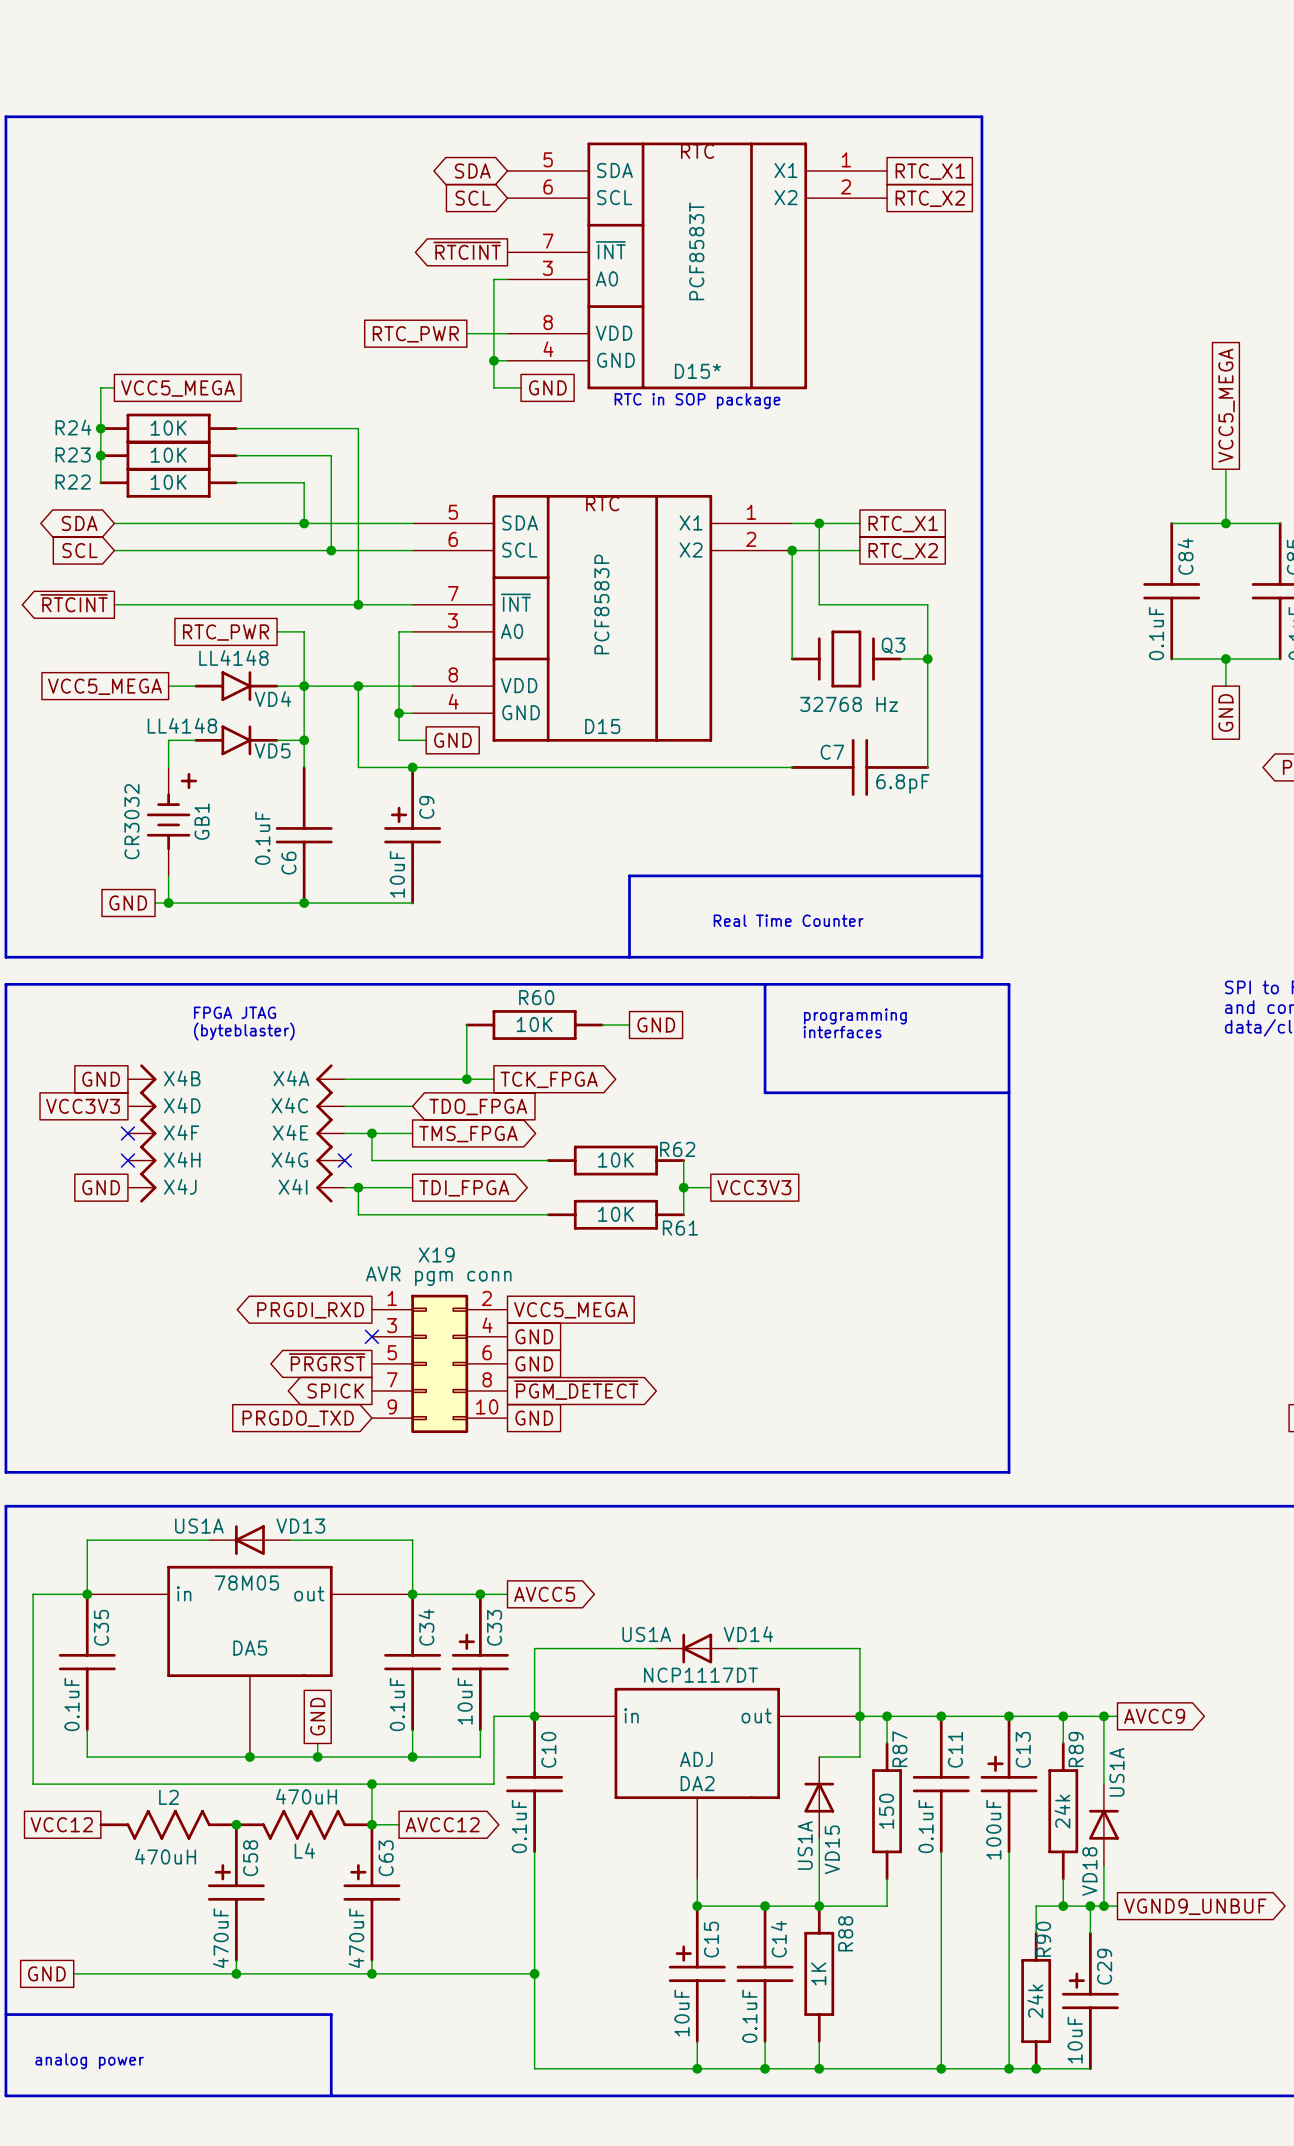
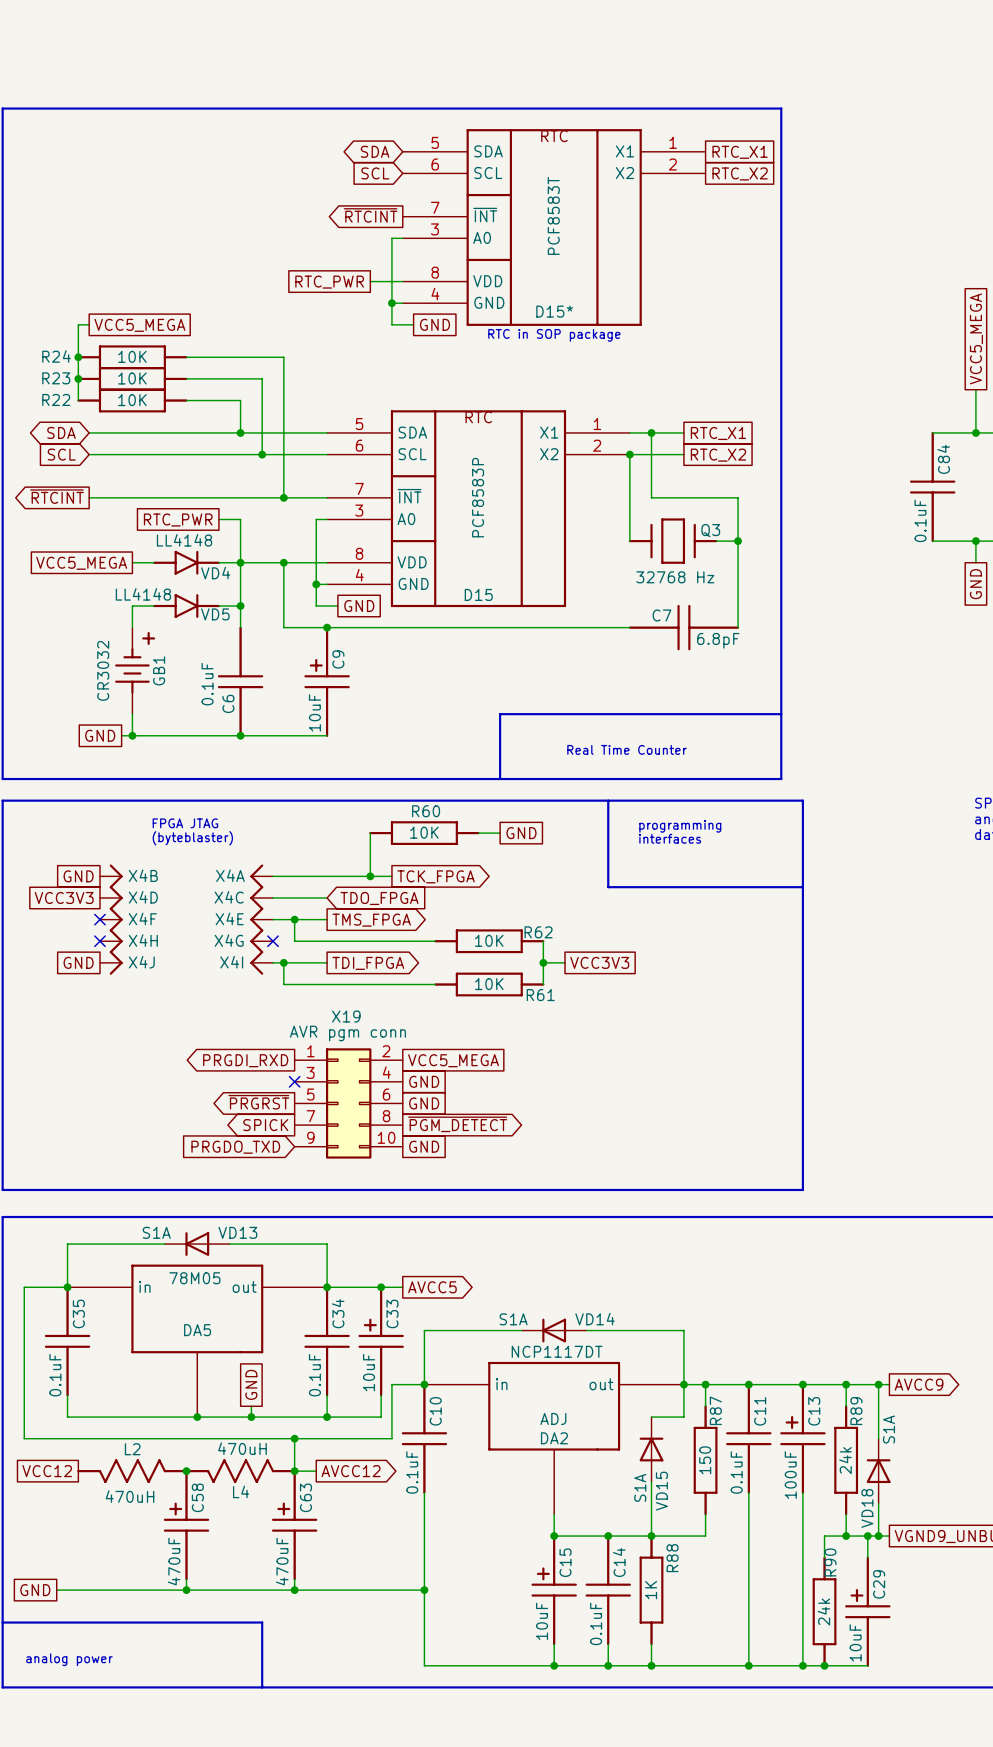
VD13 value: US1A (199, 1526) -> S1A (156, 1232)
VD14 value: US1A (646, 1634) -> S1A (513, 1319)
VD18 value: US1A (1116, 1772) -> S1A (889, 1429)
VD15 value: US1A (805, 1845) -> S1A (640, 1487)

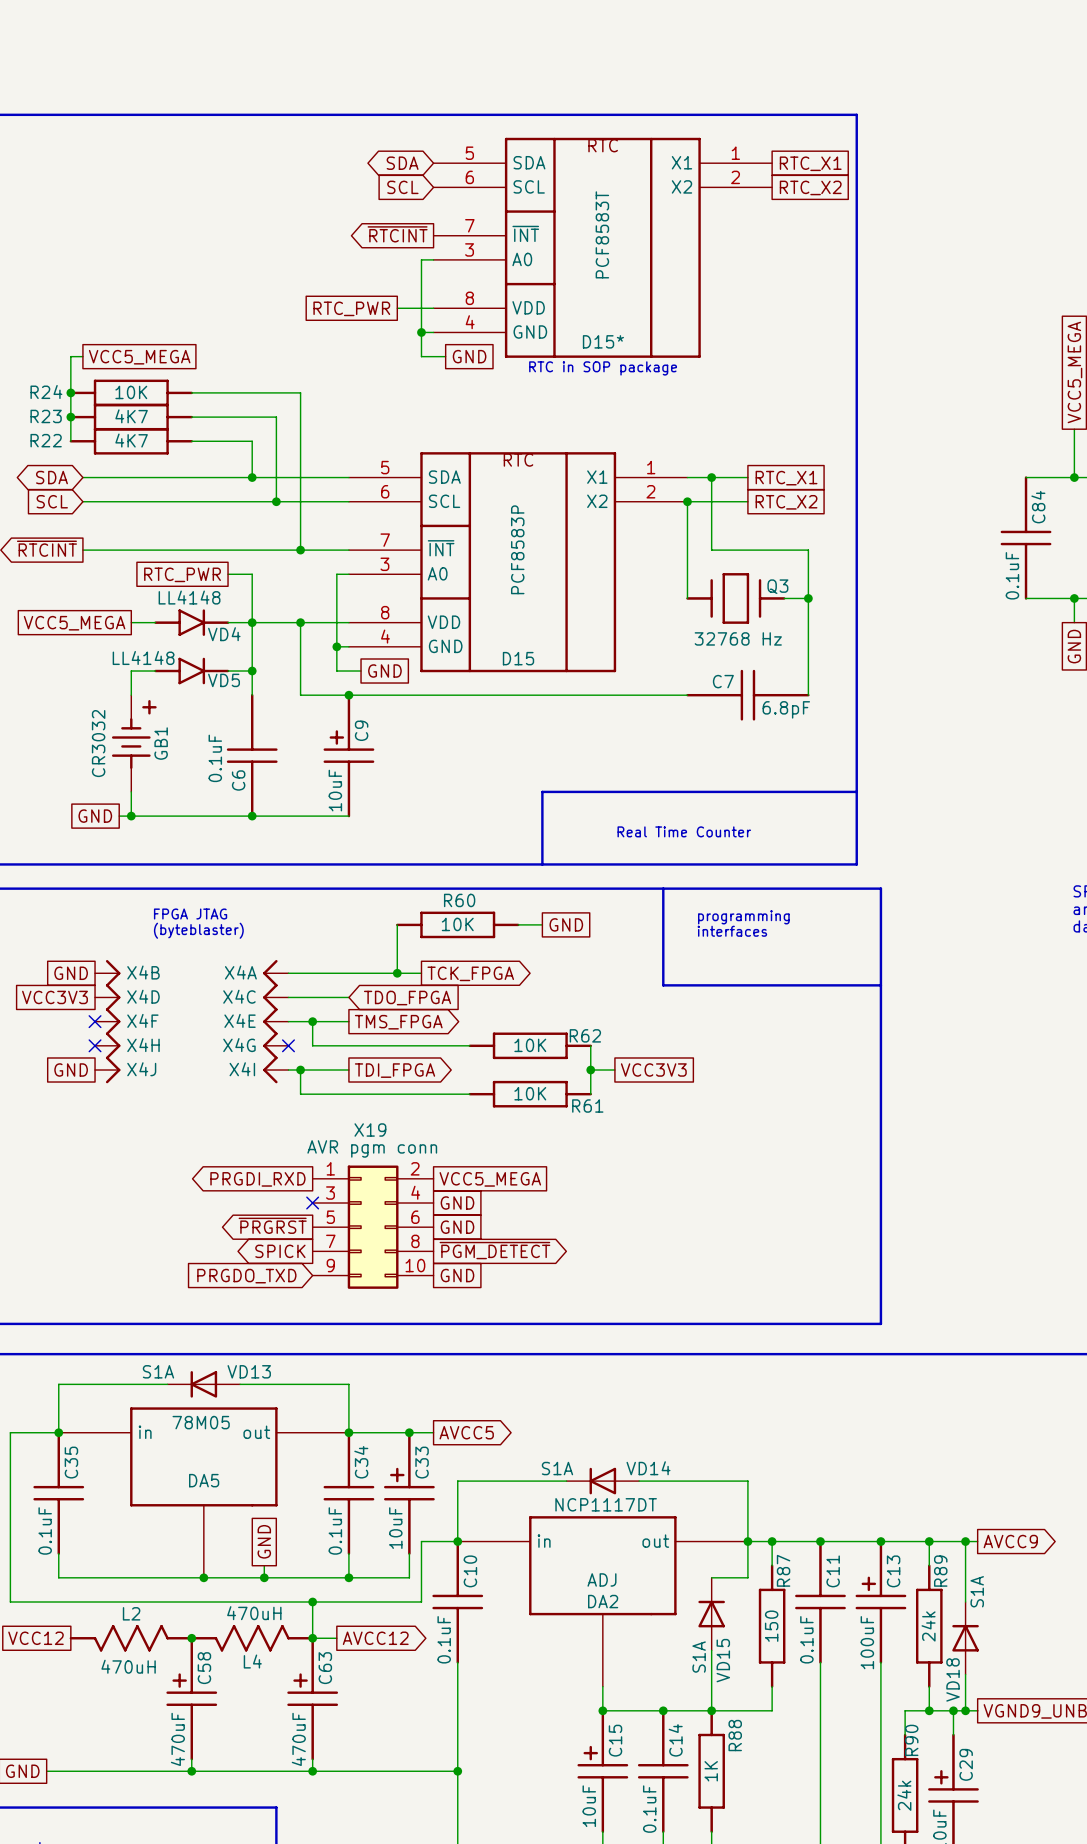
R23 value: 10K (132, 378) -> 4K7 (131, 416)
R22 value: 10K (132, 400) -> 4K7 (131, 440)

